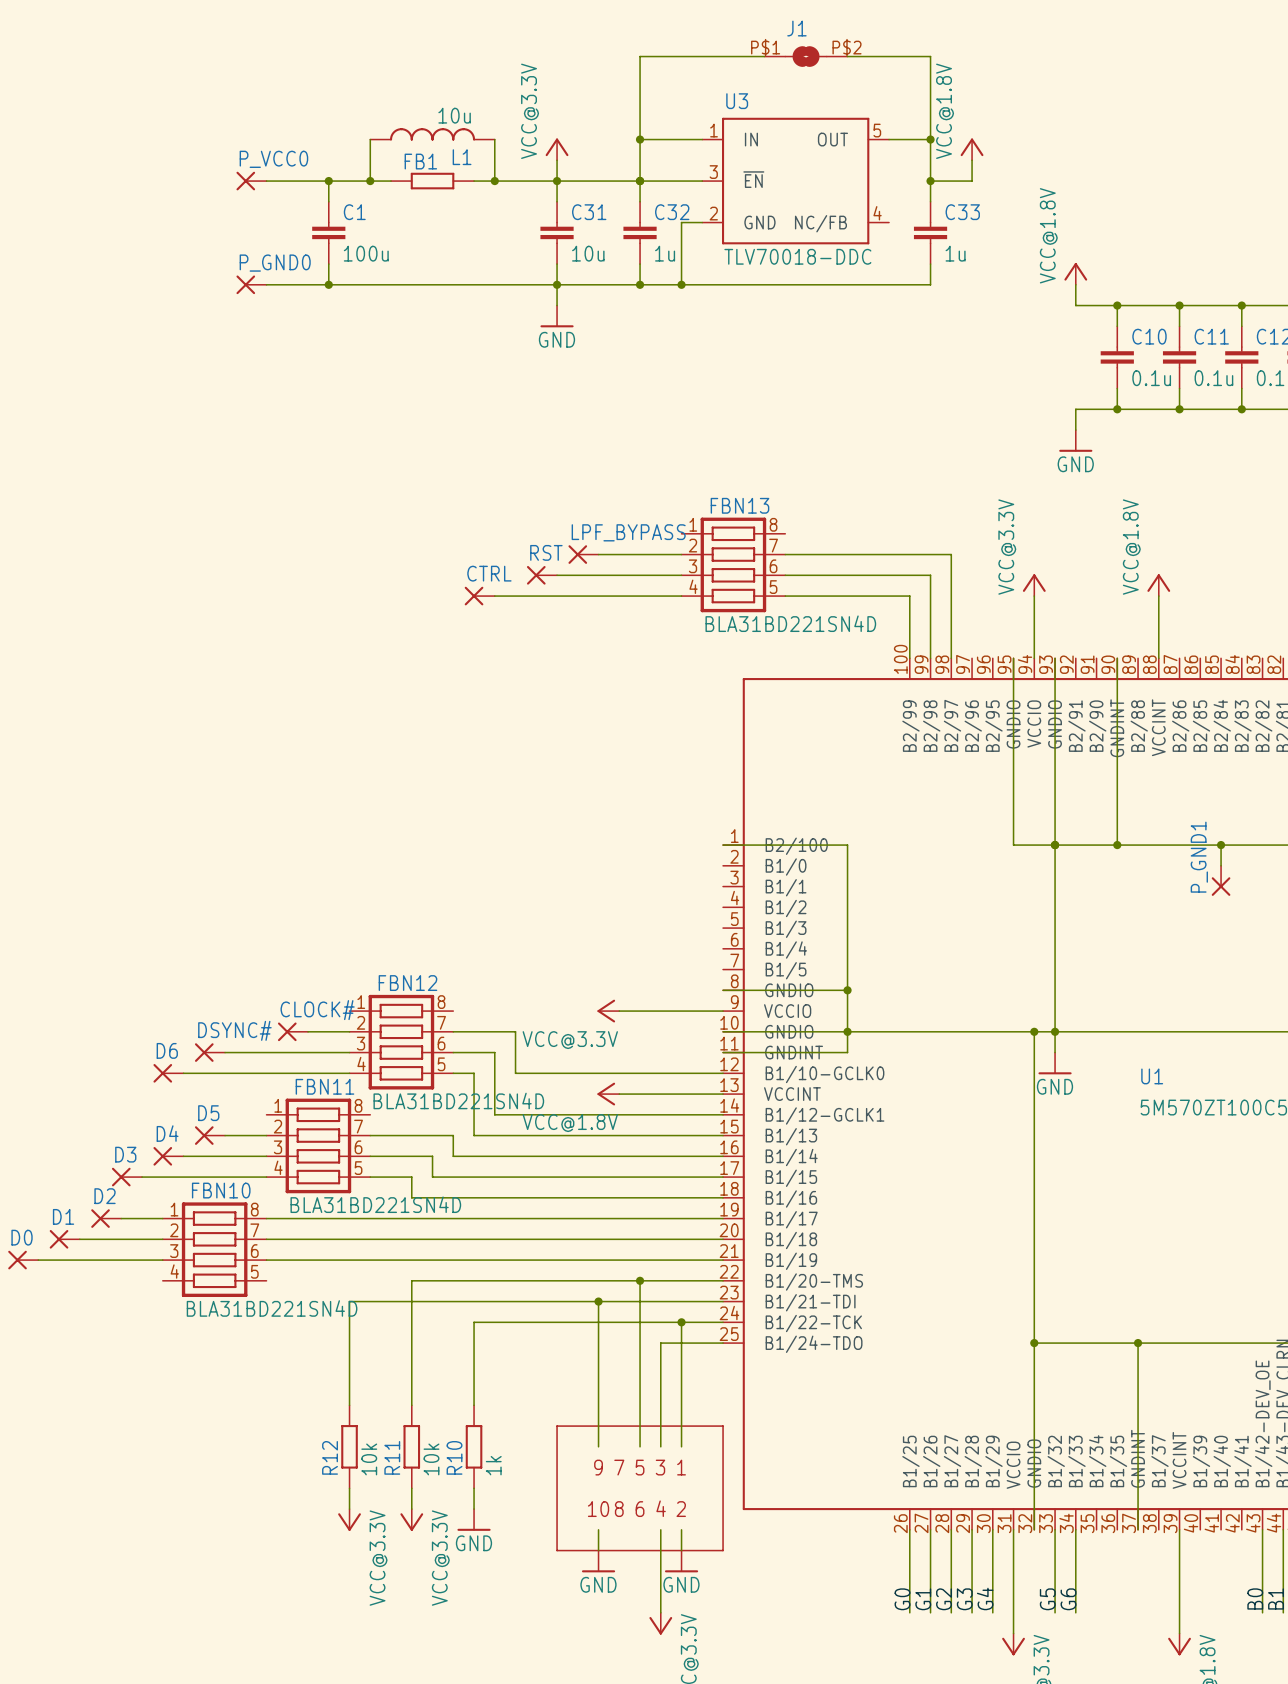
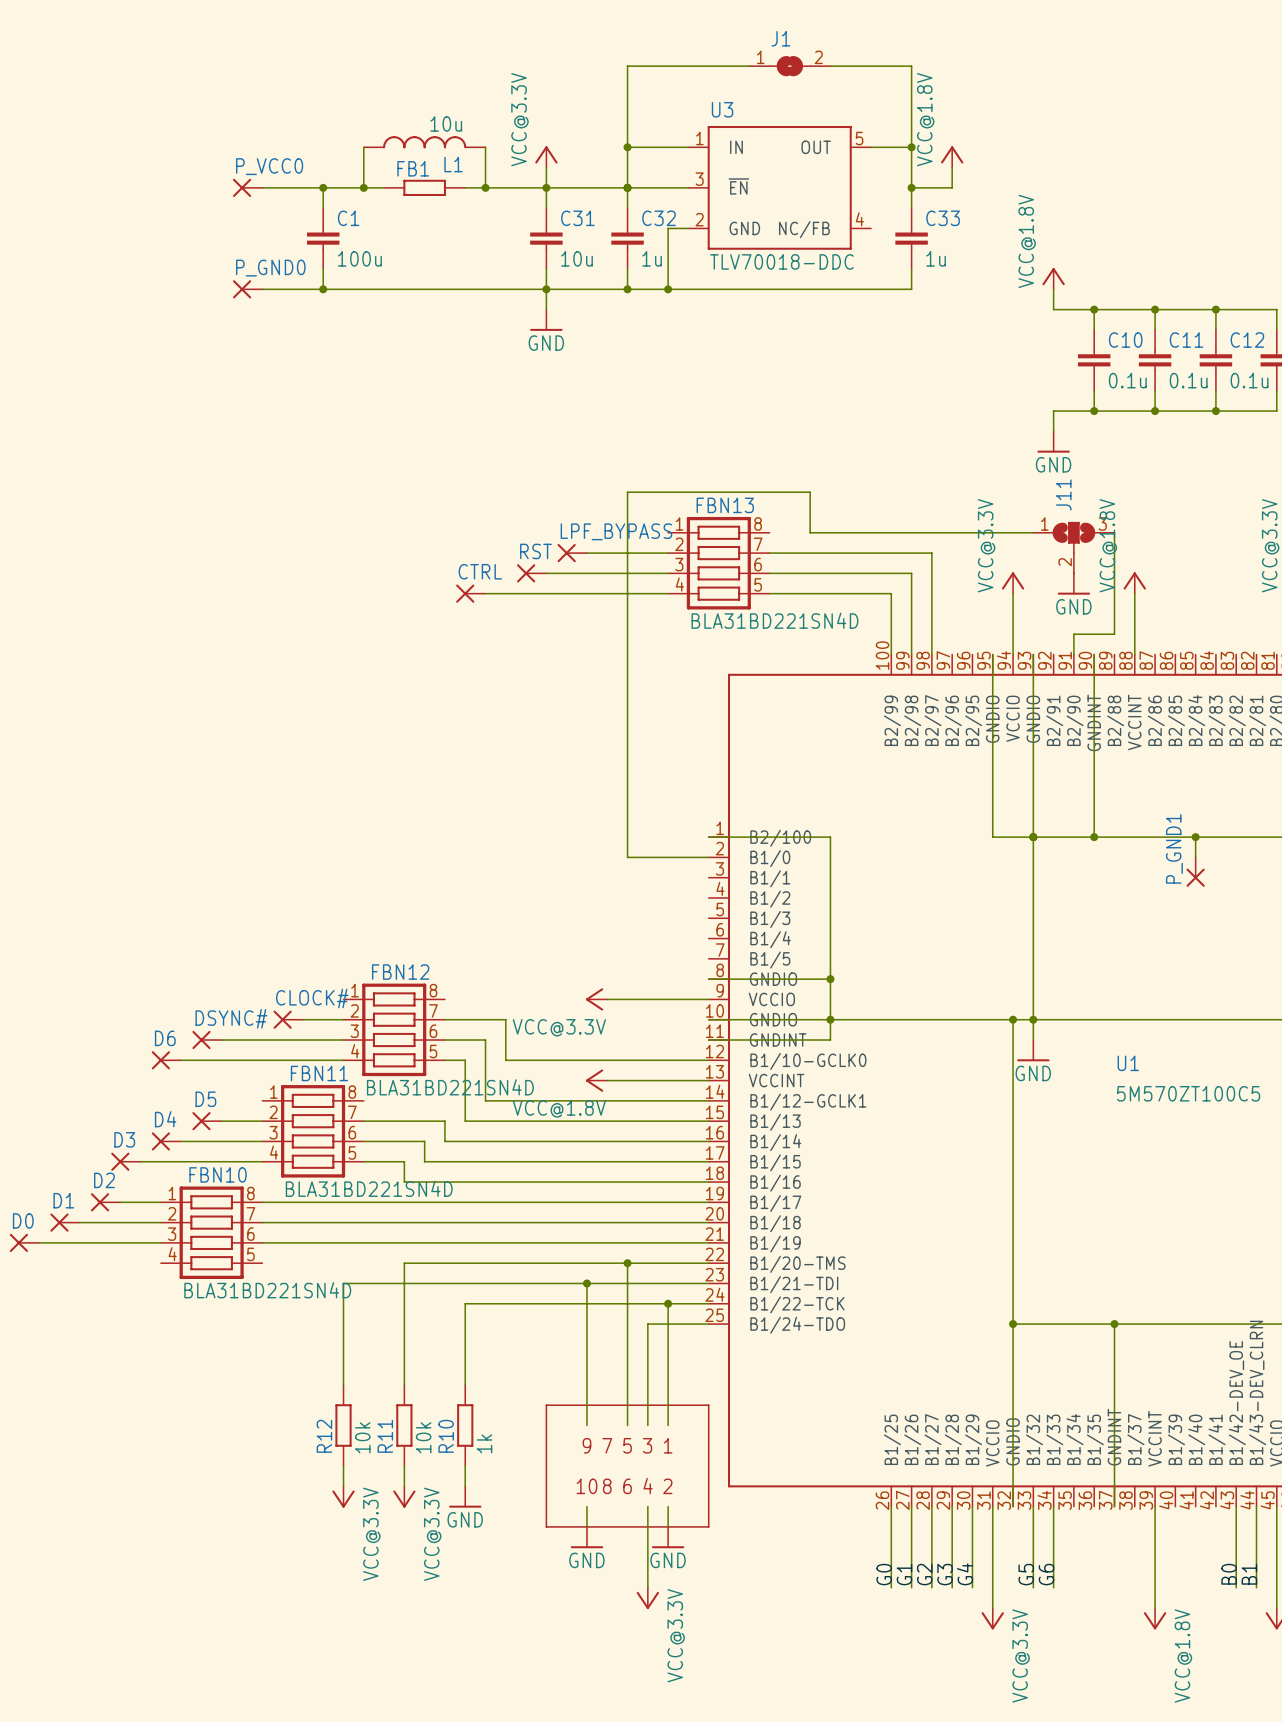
J1 pin number: P$1 (765, 47) -> 1 (760, 57)
J1 pin number: P$2 (847, 47) -> 2 (818, 57)
wire: none -> (1033, 532) (810, 532) (810, 492) (627, 492) (627, 857) (708, 857)
wire: none -> (1114, 532) (1114, 634) (1073, 634) (1073, 654)
J11: none -> (1073, 547)
power symbol: none -> GND (1073, 584)

